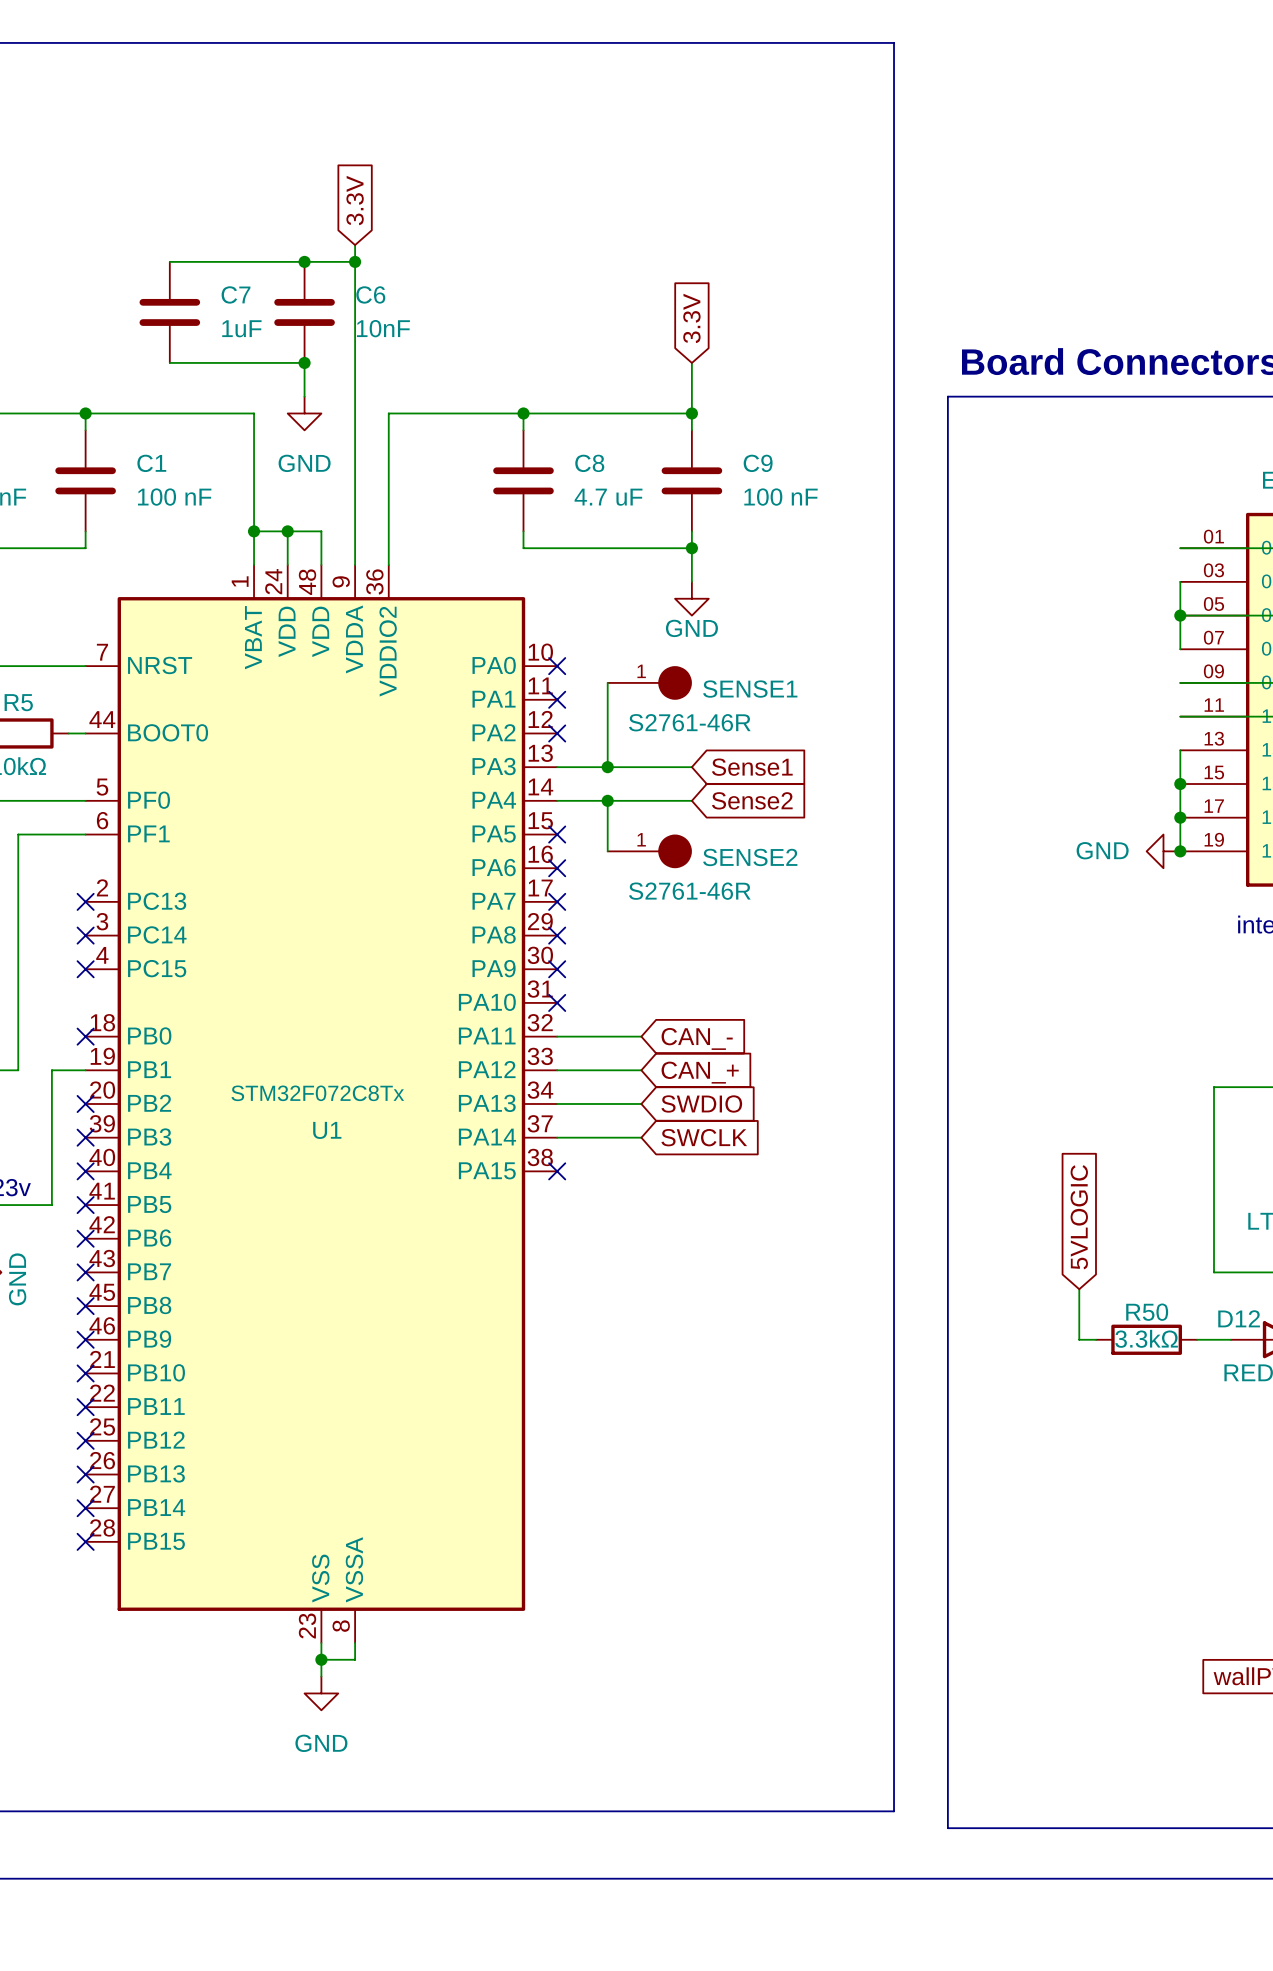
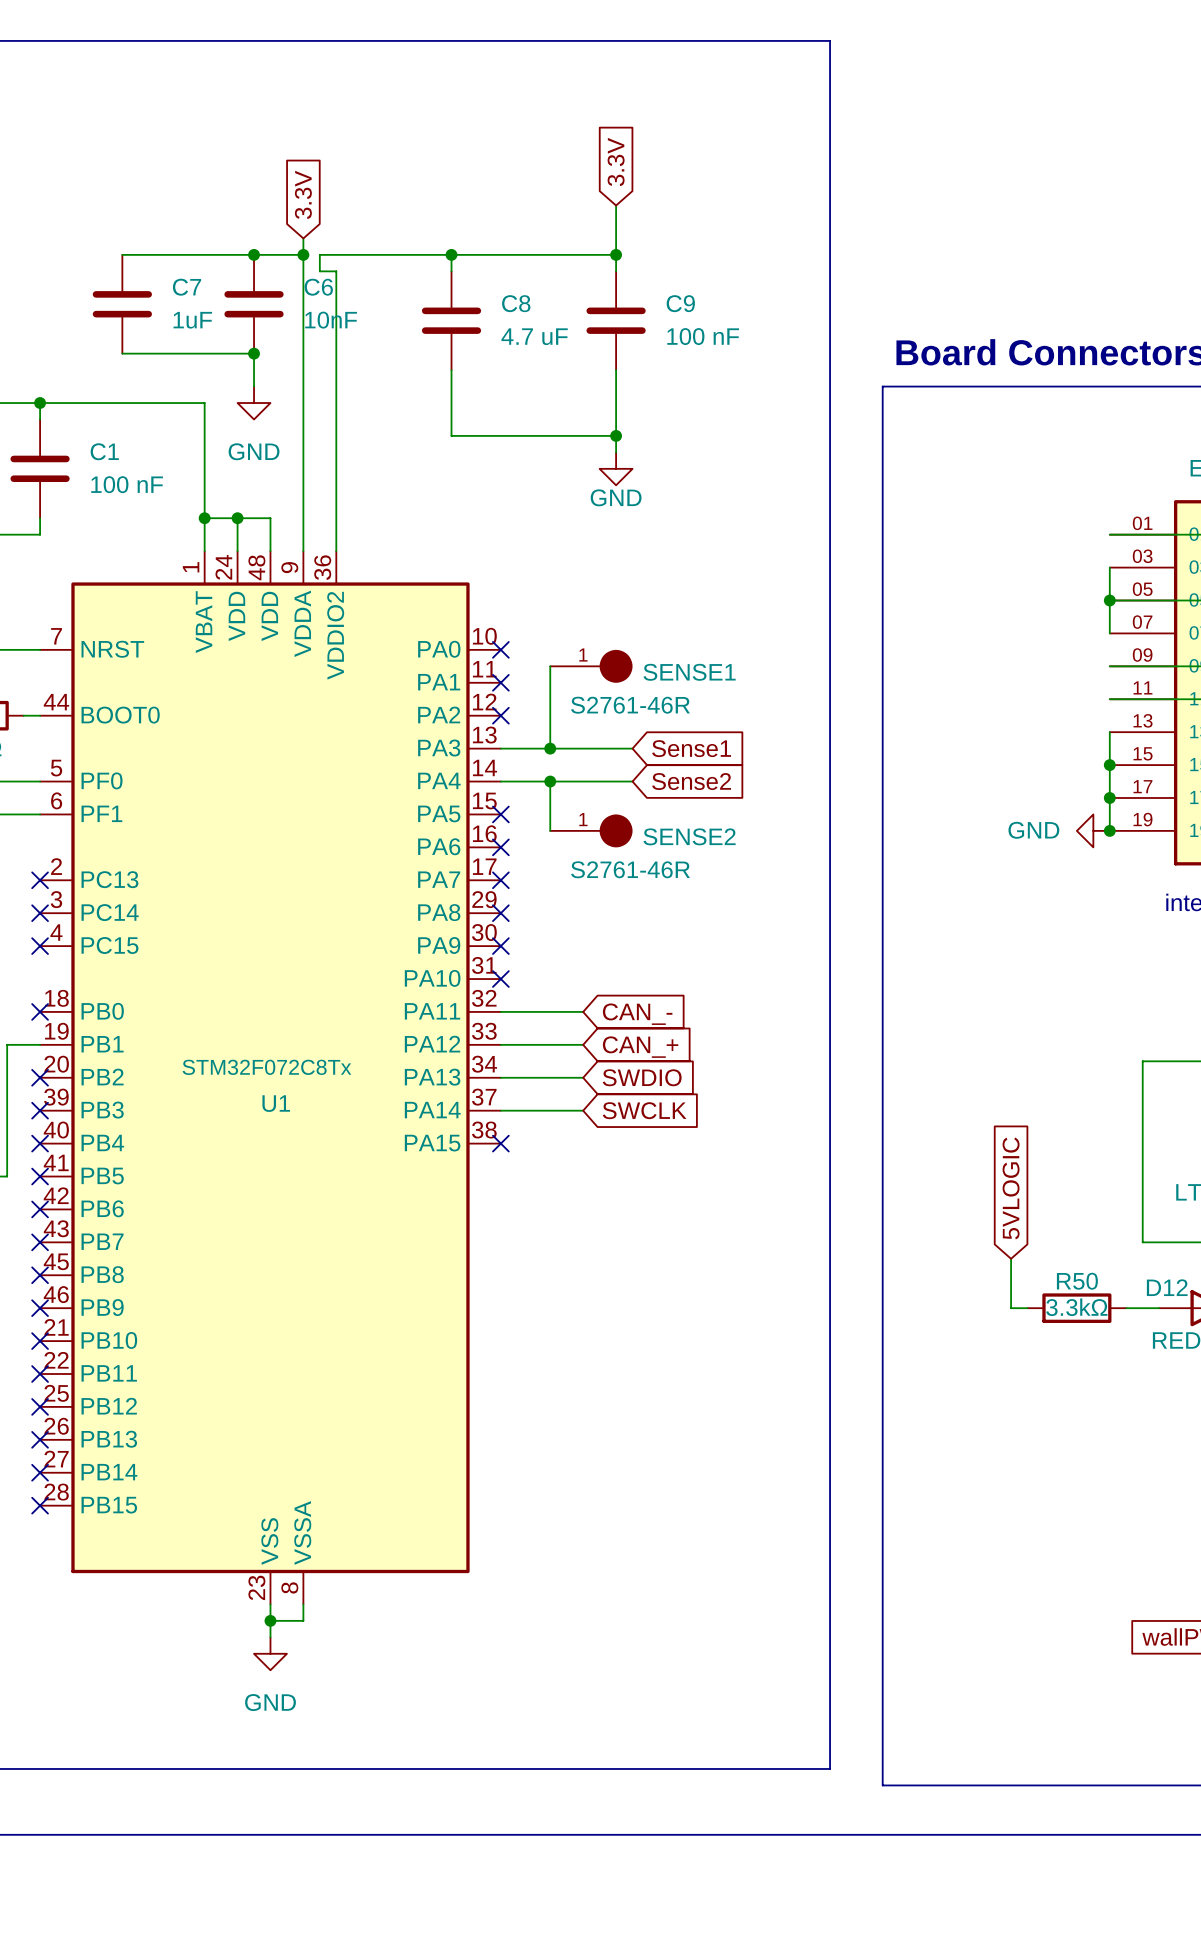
junction: none -> (451, 254)
junction: none -> (616, 254)
global label position: 3.3V (691, 318) -> 3.3V (616, 162)
wire: (691, 362) (691, 430) -> (616, 205) (616, 271)
wire: none -> (451, 370) (451, 435) (616, 435)
wire: none -> (616, 370) (616, 452)
wire: (388, 413) (691, 413) -> (336, 403) (336, 271) (319, 271) (319, 254) (616, 254)
wire: (523, 413) (523, 430) -> (451, 254) (451, 271)
junction: (523, 413) -> none
junction position: (691, 413) -> (616, 435)
C8 position: (523, 480) -> (451, 320)
C9 position: (691, 480) -> (616, 320)
wire: (523, 531) (523, 548) (691, 548) -> none
wire: (691, 531) (691, 581) -> none
junction: (691, 548) -> none
power symbol position: GND (691, 598) -> GND (616, 468)

